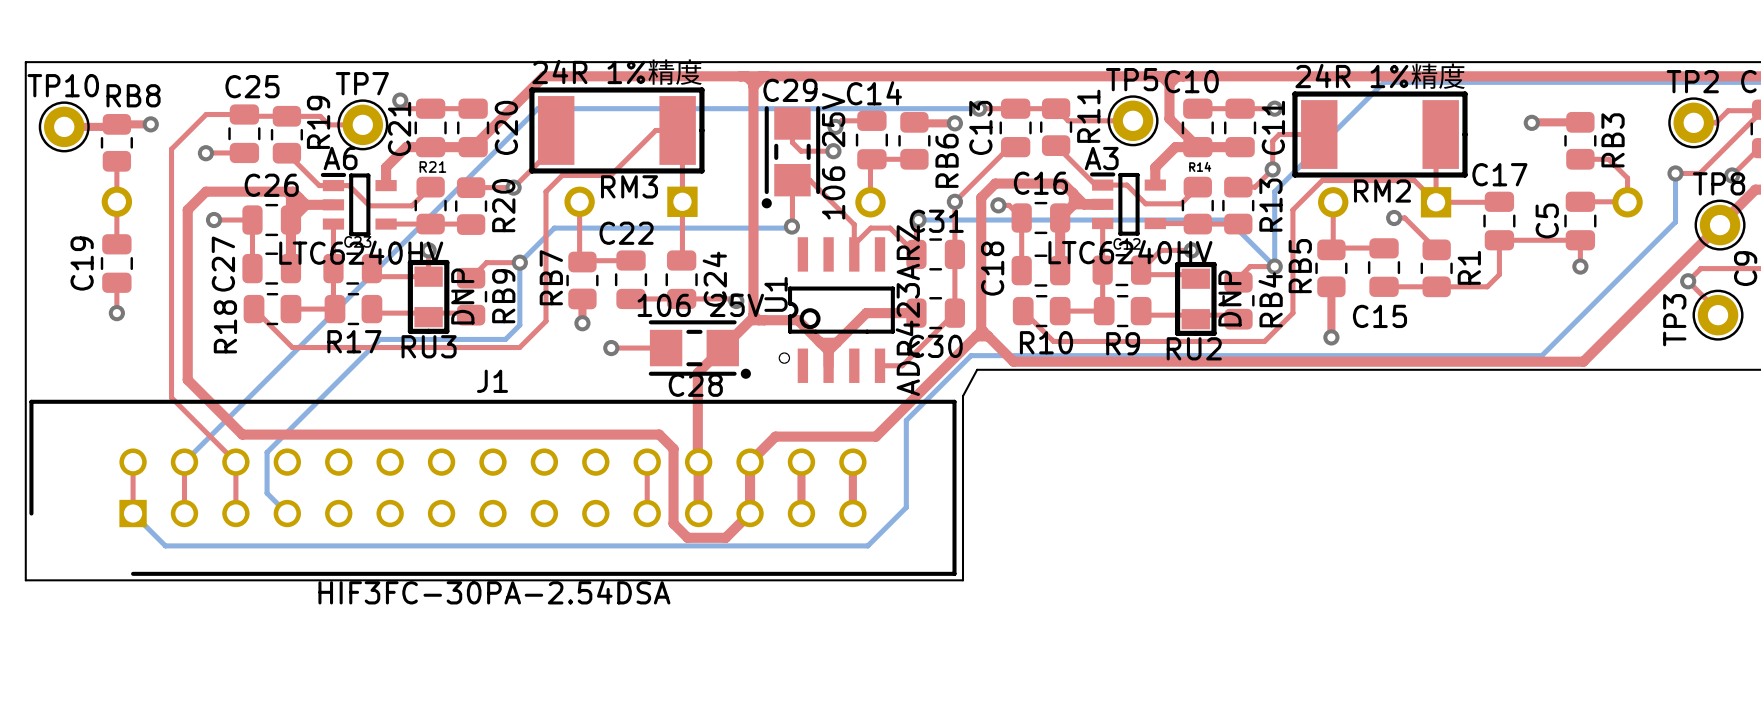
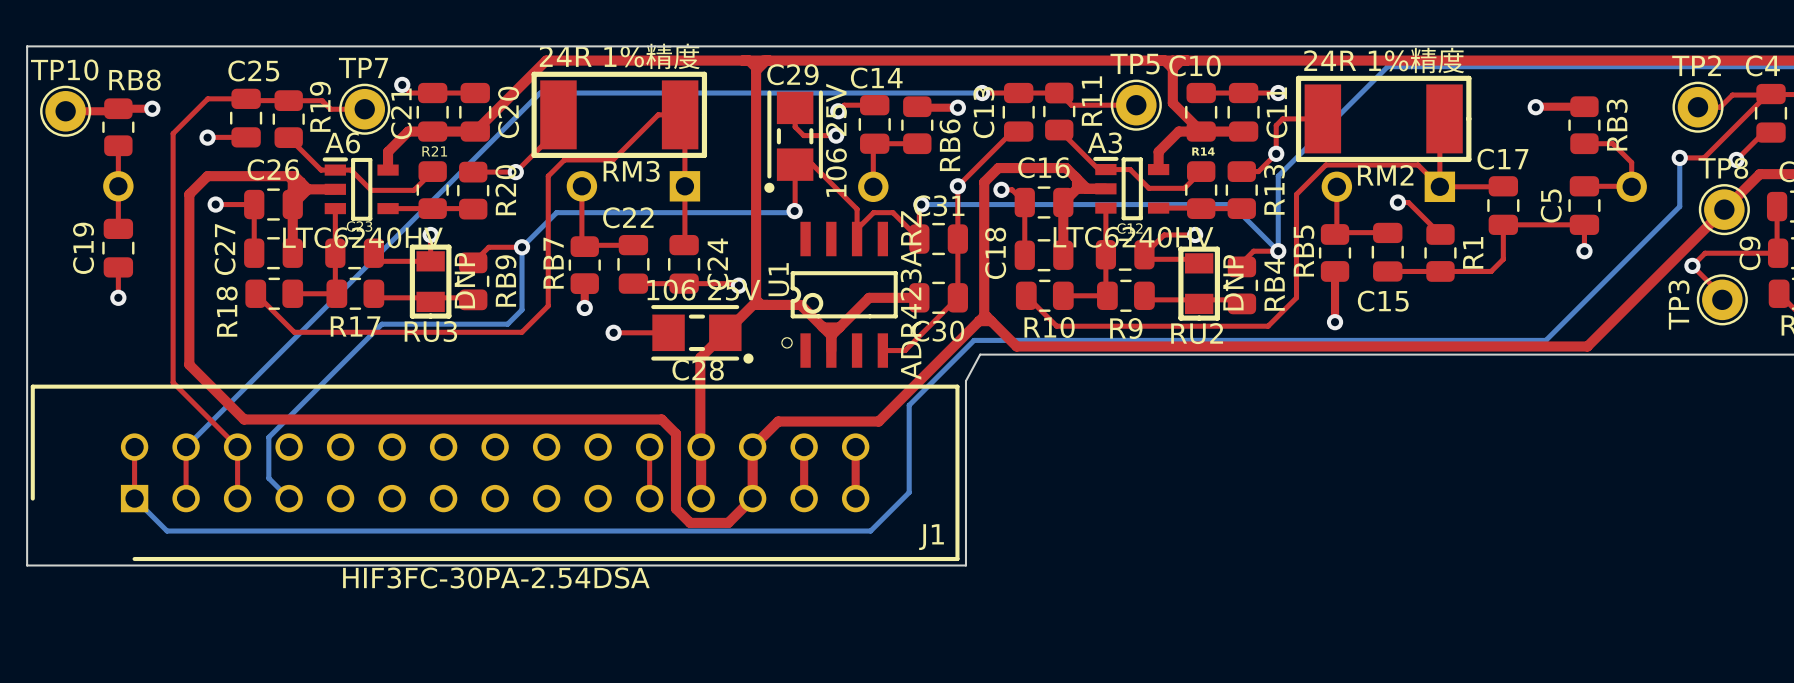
J1 name position: J1 (492, 381) -> J1 (931, 537)

